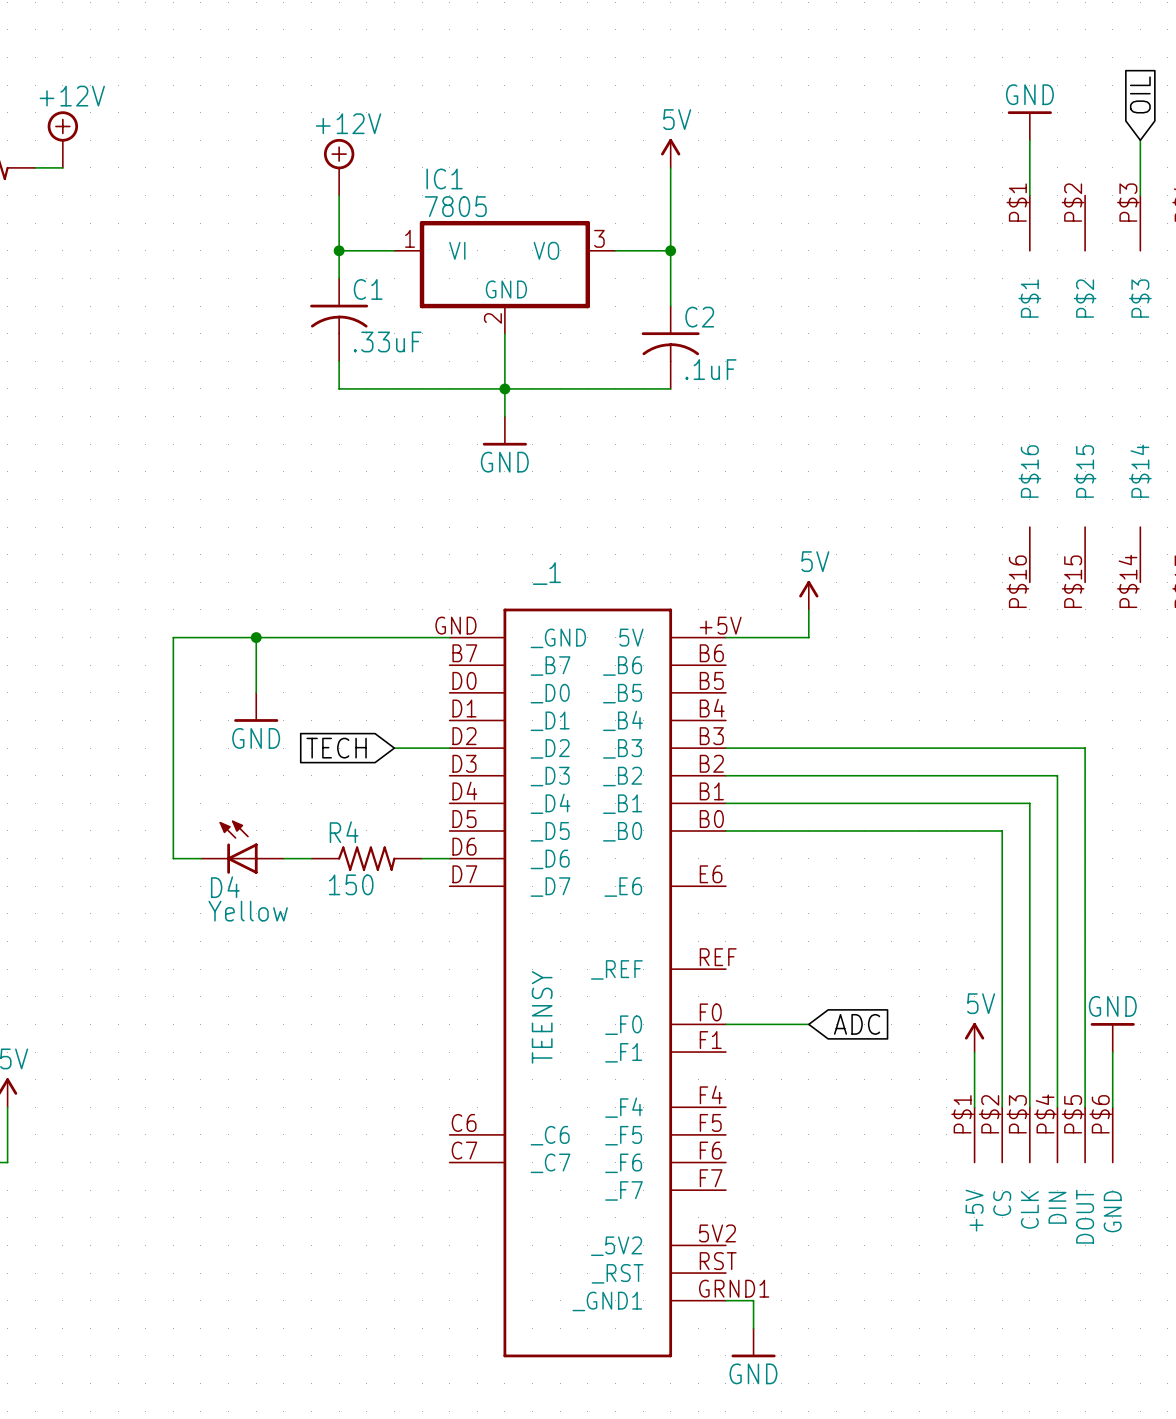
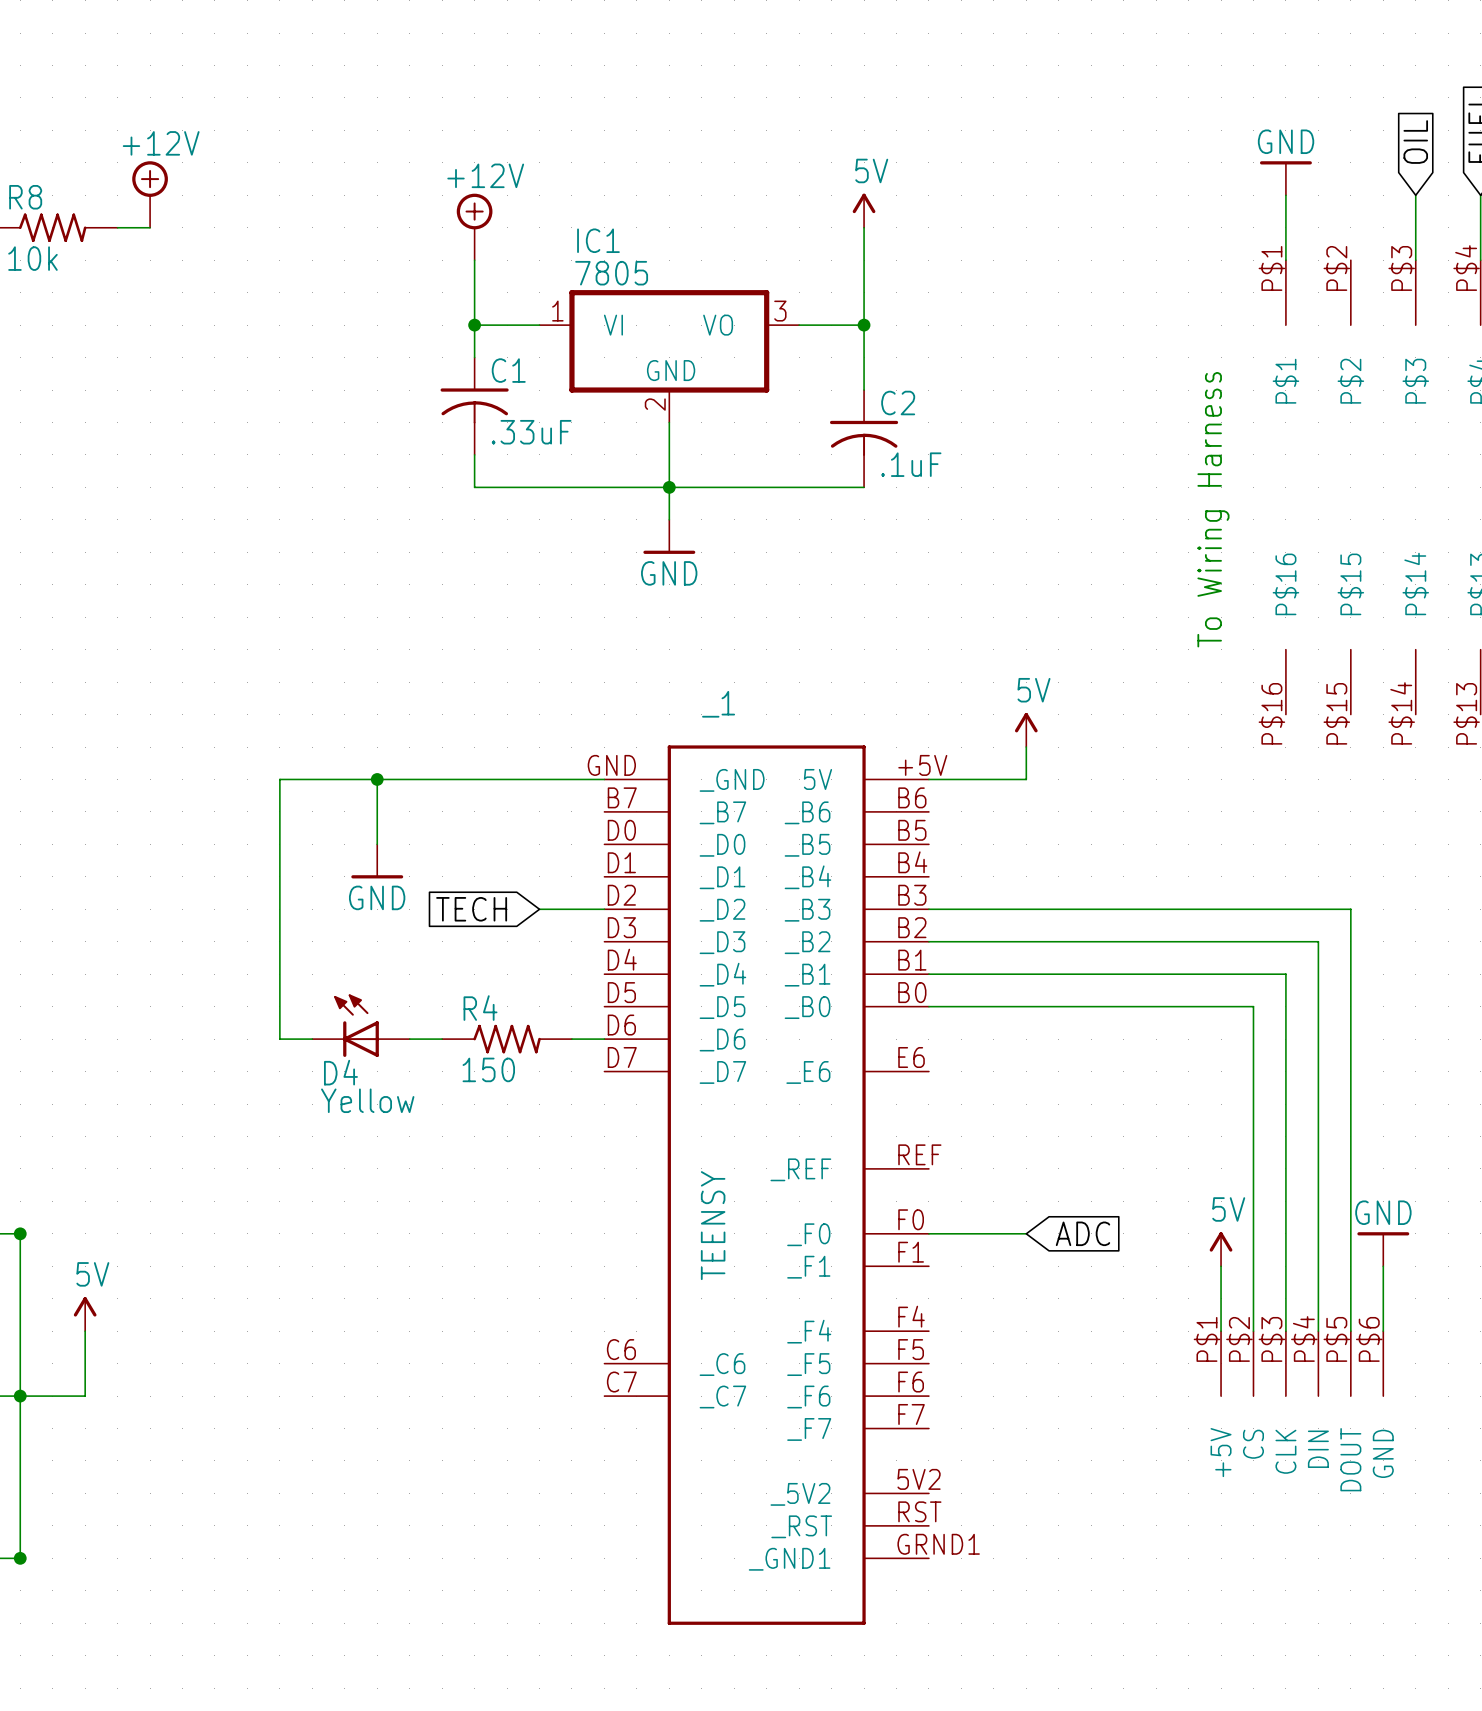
text: none -> To Wiring Harness (1213, 509)
wire: (725, 1300) (753, 1300) (753, 1328) -> none
power symbol: GND (753, 1342) -> none

